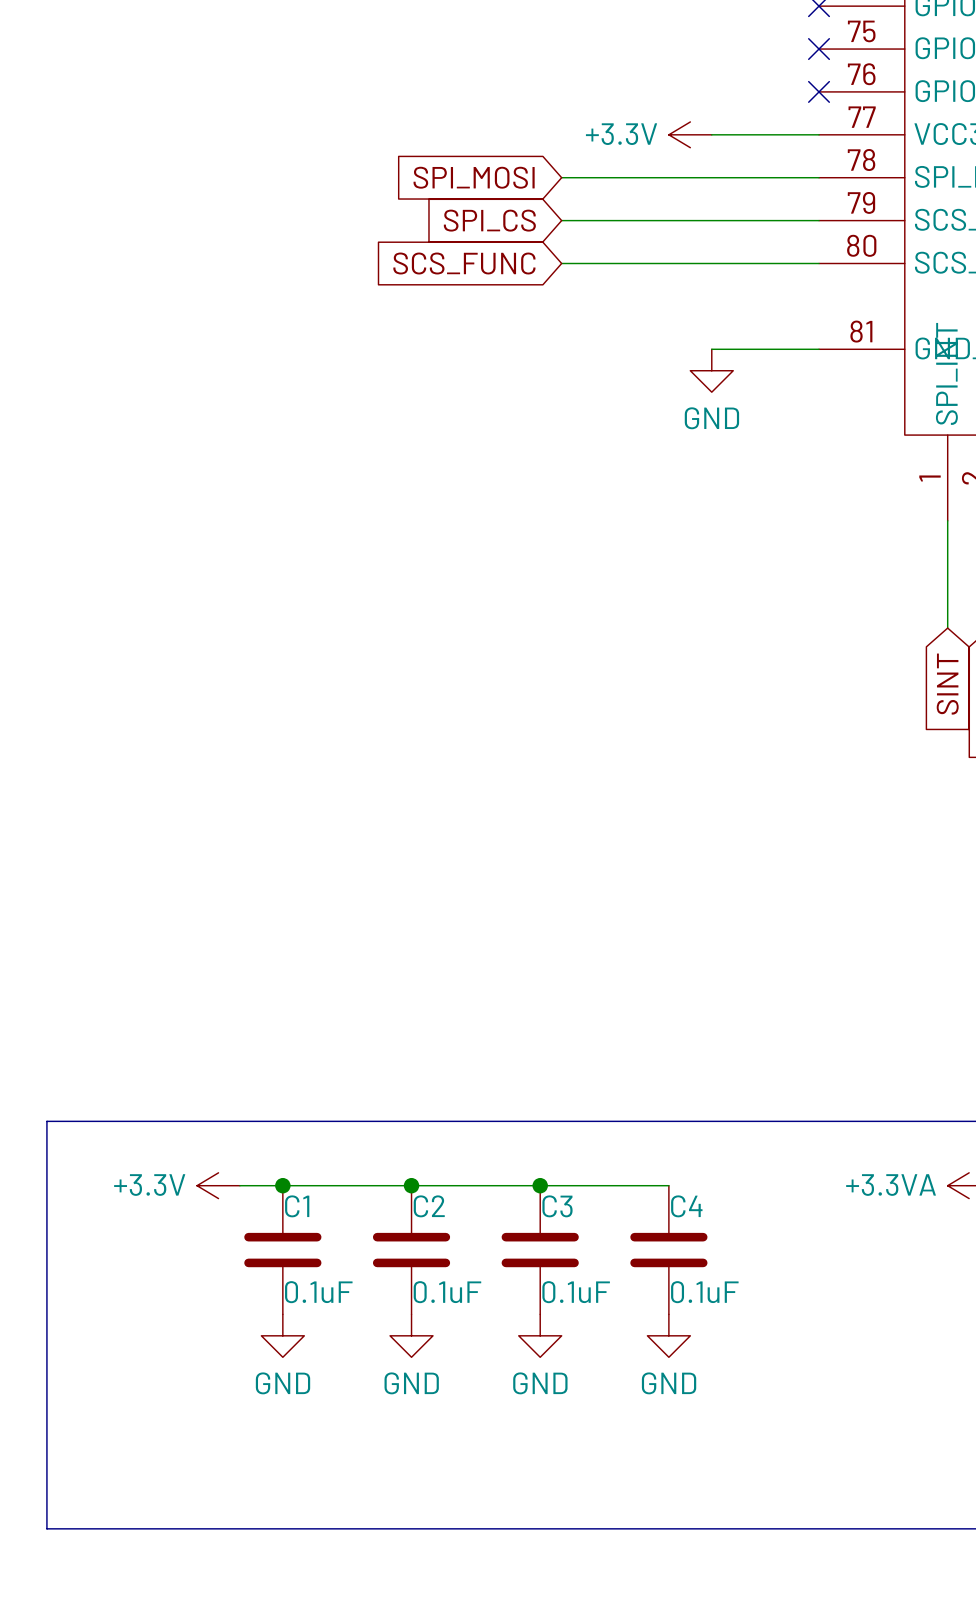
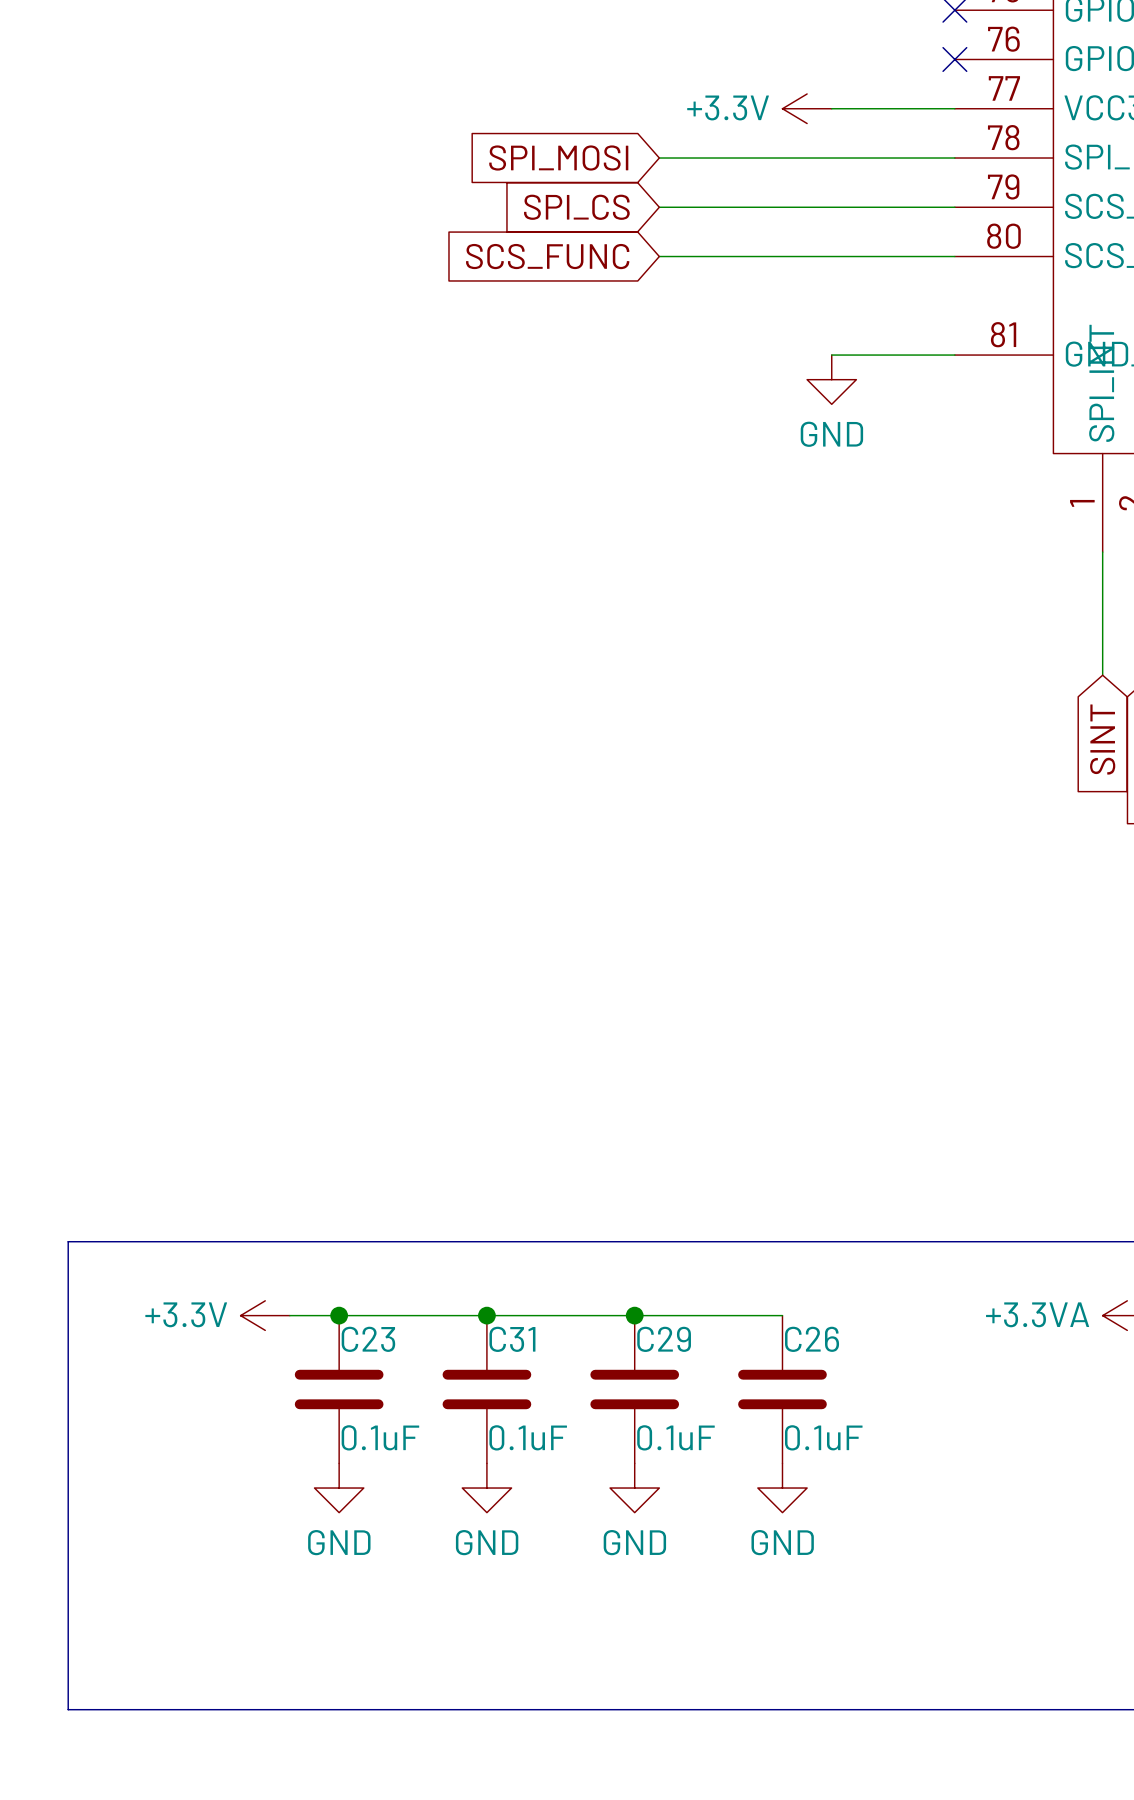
C1 name: C1 (297, 1206) -> C23 (368, 1339)
C2 name: C2 (429, 1206) -> C31 (512, 1339)
C3 name: C3 (557, 1206) -> C29 (664, 1339)
C4 name: C4 (686, 1206) -> C26 (812, 1339)

